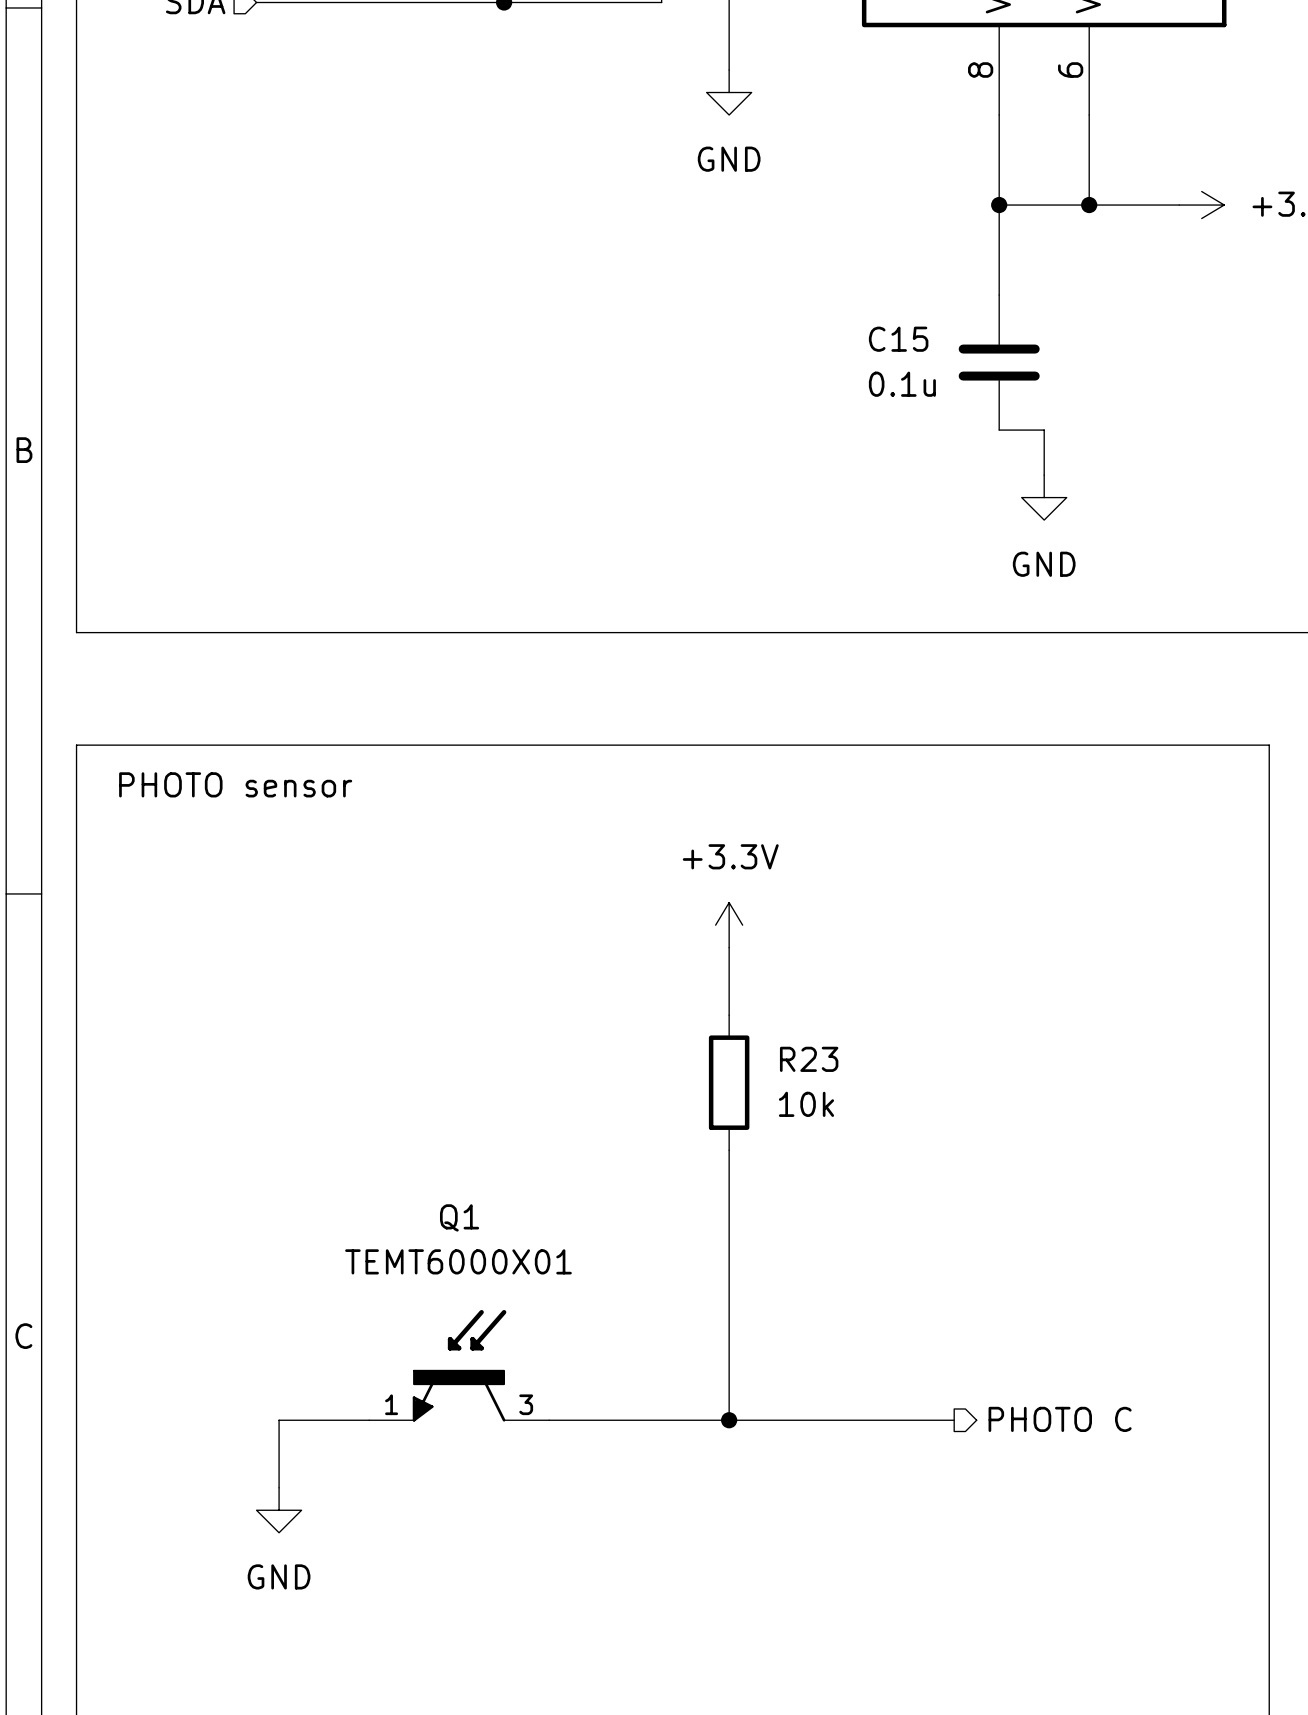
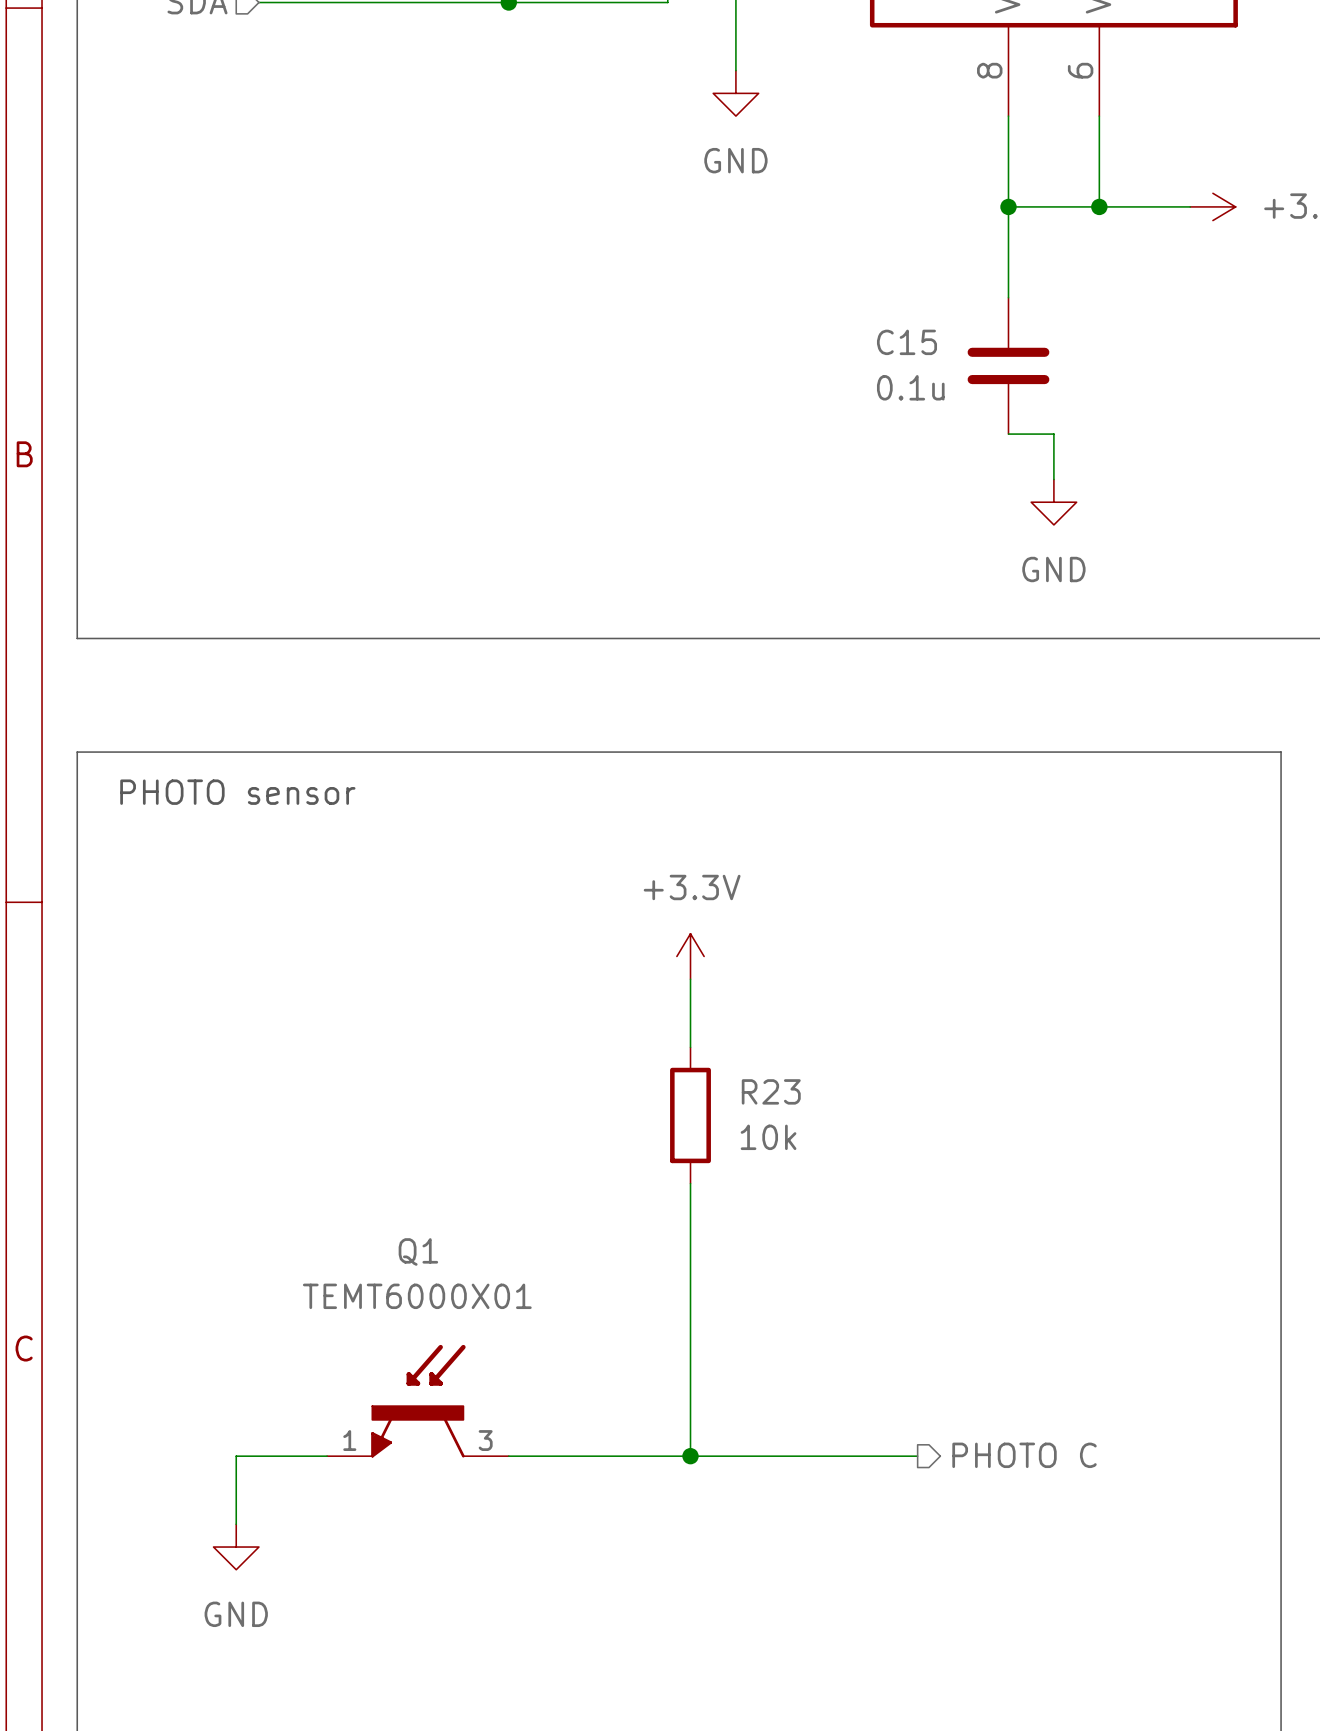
power symbol position: +3.3V (729, 925) -> +3.3V (690, 956)
wire: (729, 947) (729, 1015) -> (690, 979) (690, 1047)
R23 position: (729, 1082) -> (690, 1115)
wire: (729, 1150) (729, 1420) -> (690, 1183) (690, 1456)
Q1 position: (459, 1365) -> (417, 1401)
hierarchical label position: PHOTO C (1060, 1419) -> PHOTO C (1024, 1455)
wire: (369, 1420) (279, 1420) (279, 1487) -> (327, 1456) (236, 1456) (236, 1524)
wire: (549, 1420) (954, 1420) -> (508, 1456) (917, 1456)
junction position: (729, 1420) -> (690, 1456)
power symbol position: GND (279, 1510) -> GND (236, 1547)

